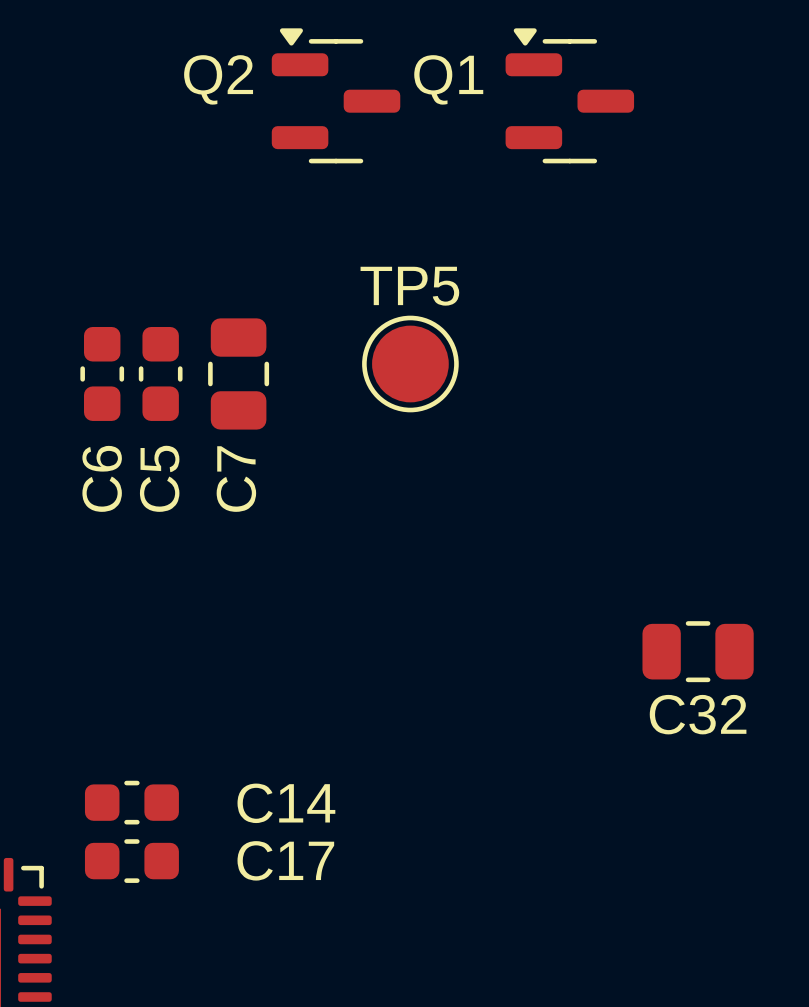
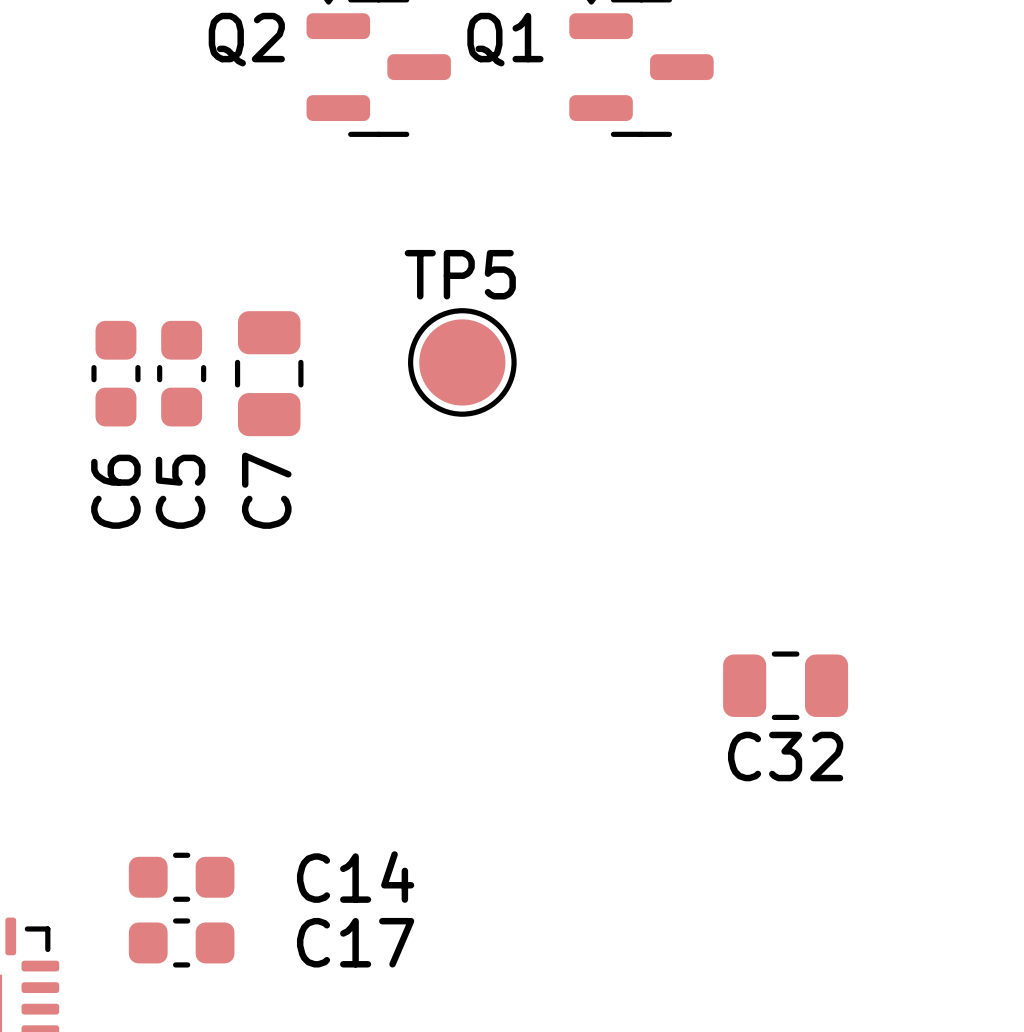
C14 position: (131, 802) -> (181, 877)
C17 position: (131, 861) -> (181, 942)

